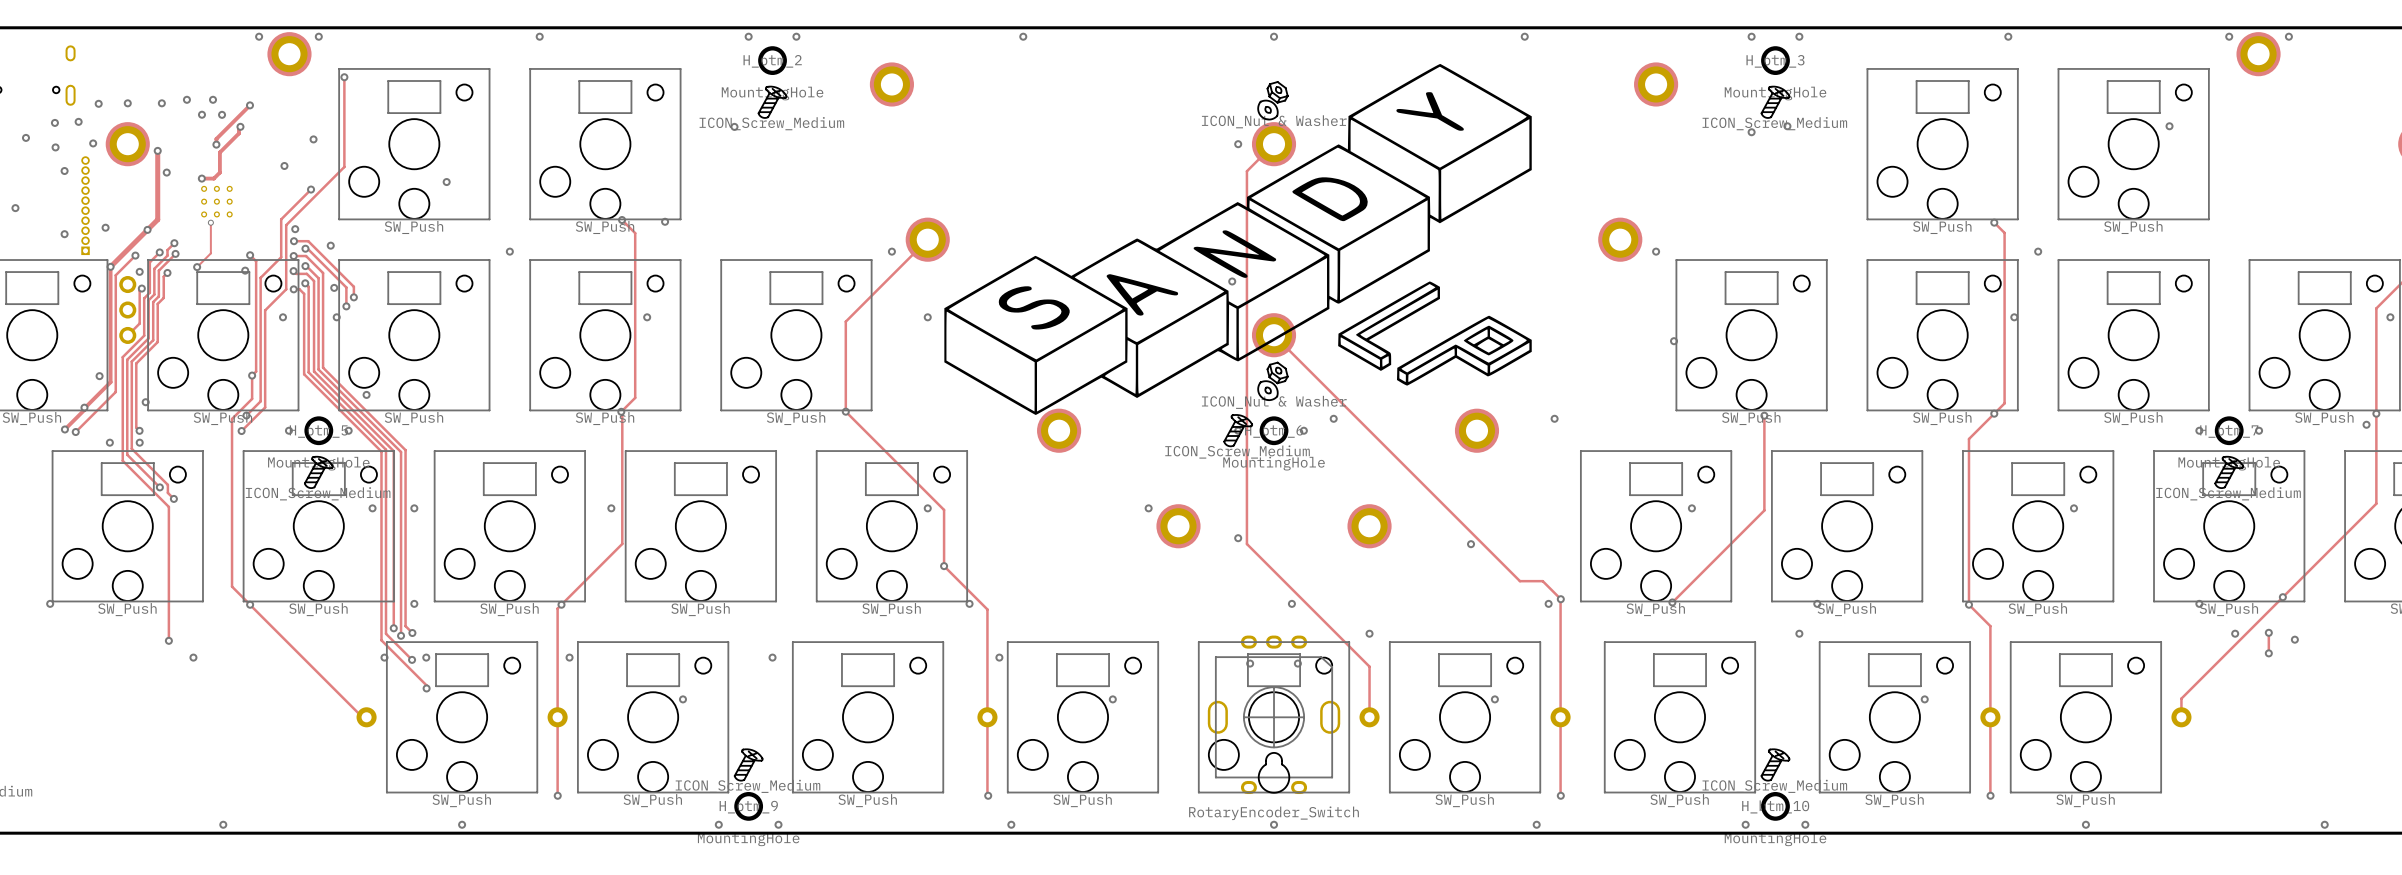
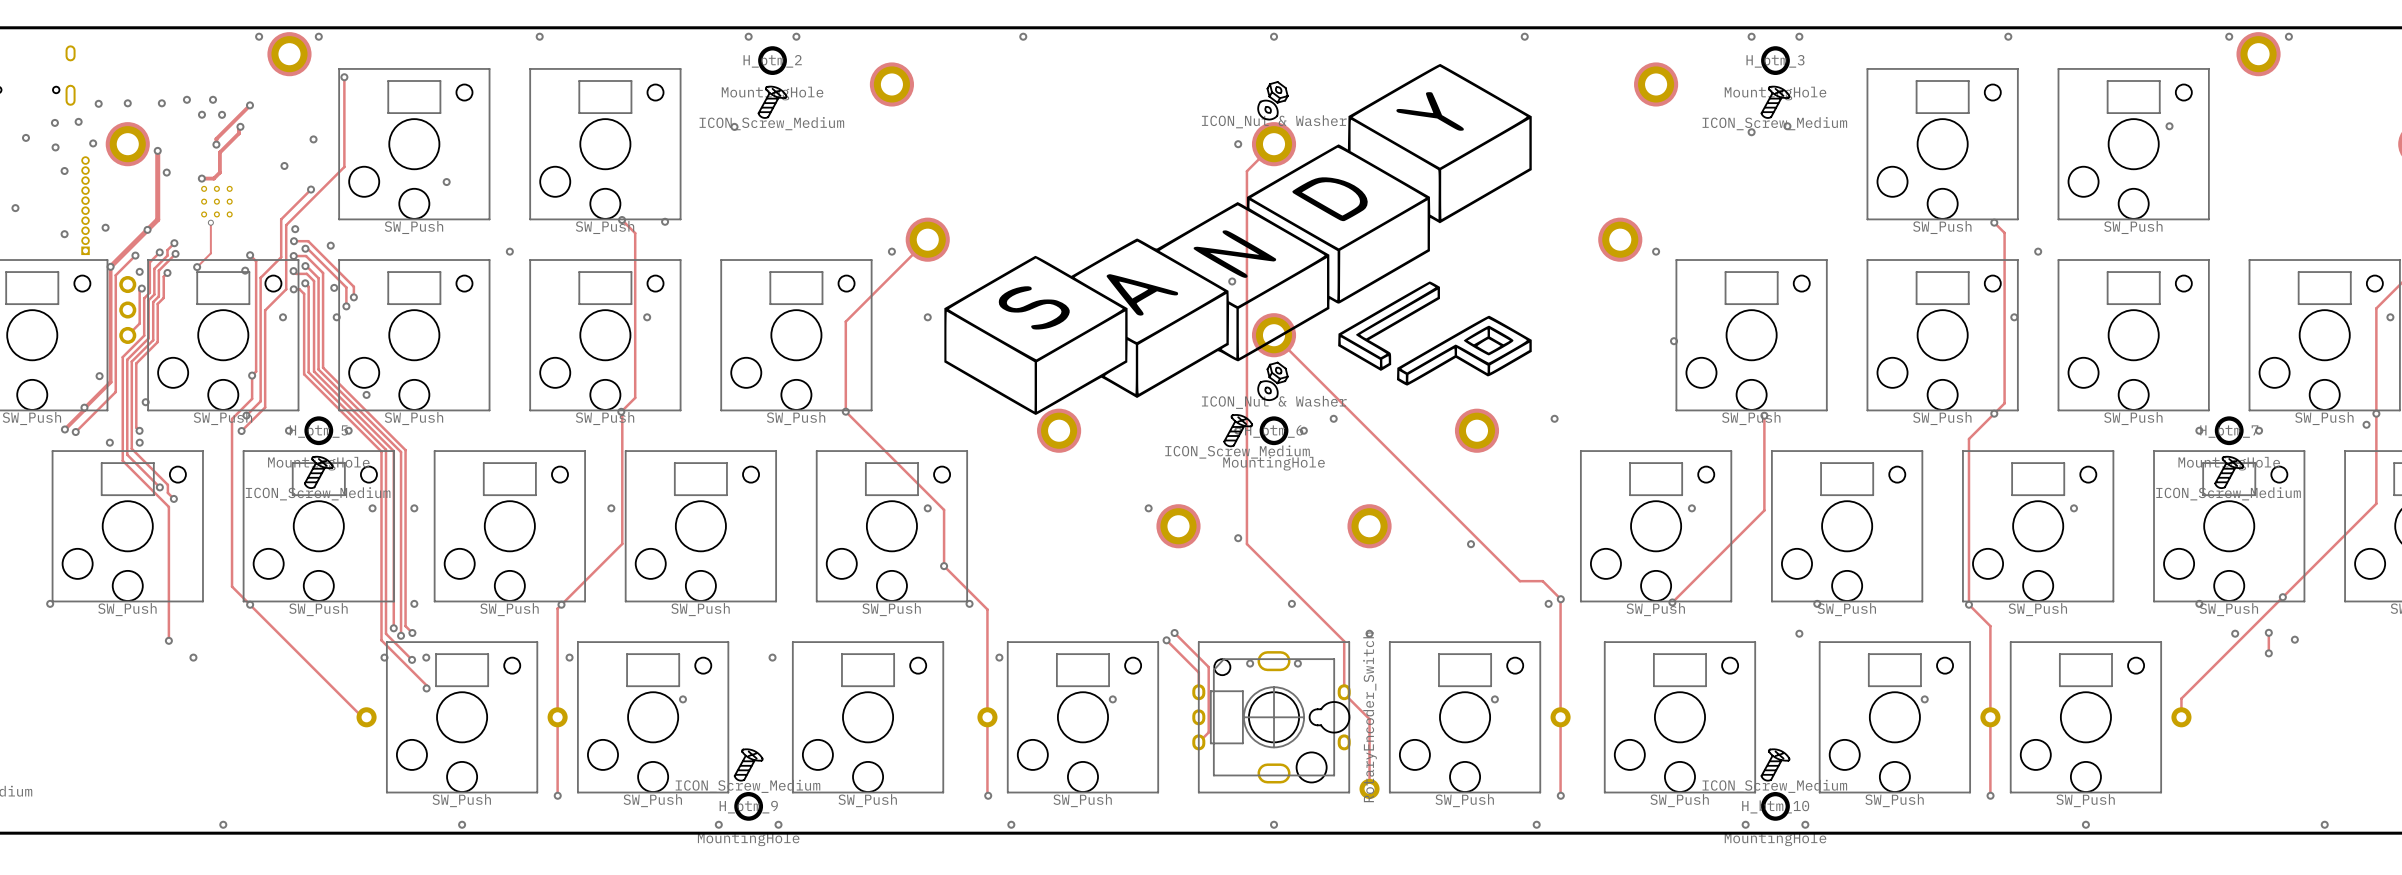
track: none -> (1174, 633) (1208, 667) (1208, 732) (1198, 742)
via: none -> (1174, 633)
track: none -> (1166, 640) (1198, 672) (1198, 692)
via: none -> (1166, 640)
track: (1344, 641) (1369, 666) (1369, 717) -> (1344, 641) (1344, 693) (1369, 719) (1369, 788)
part rotation: 0° (1274, 714) -> 90° counterclockwise (1271, 717)
part position: (1369, 717) -> (1369, 788)

